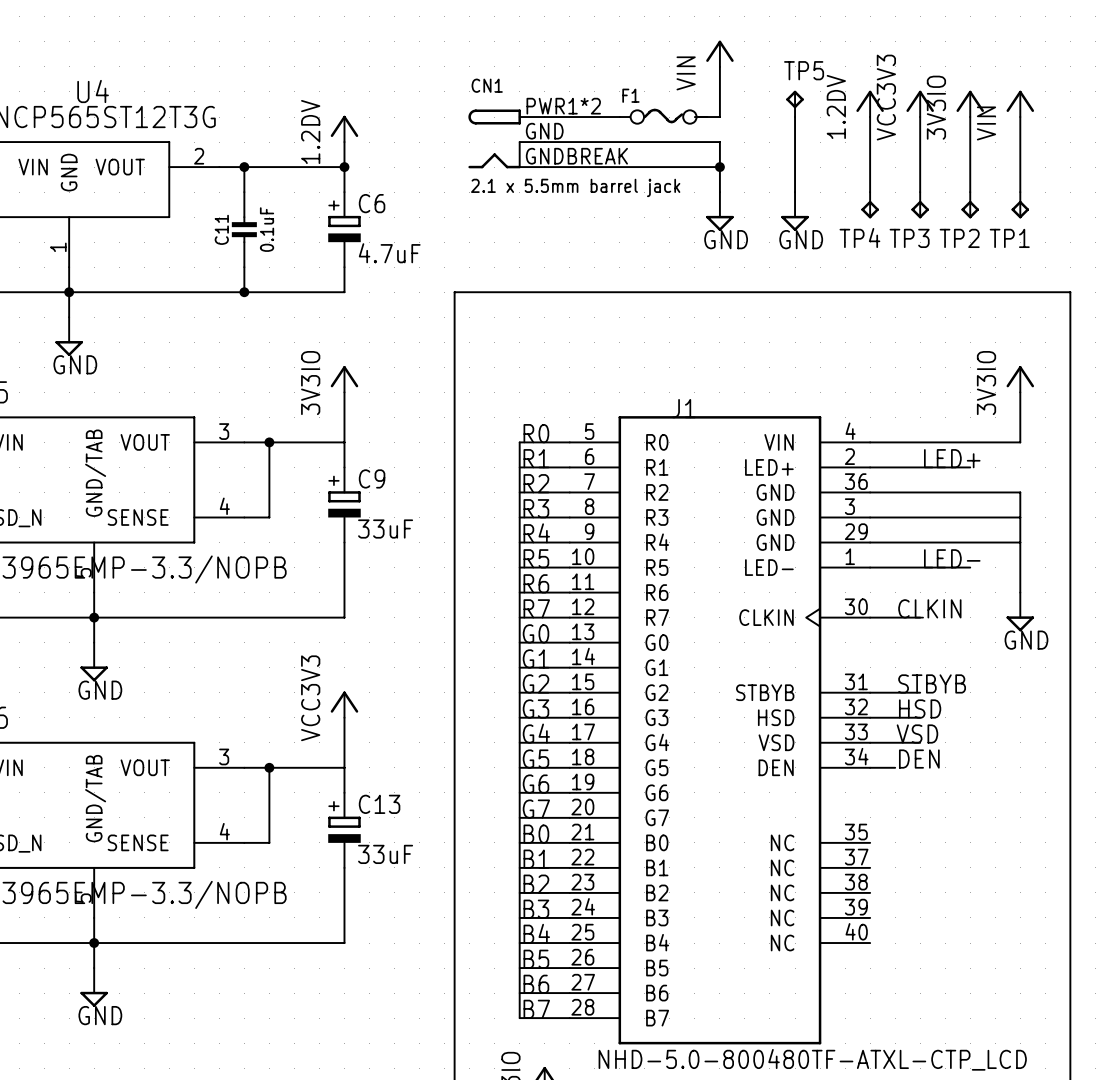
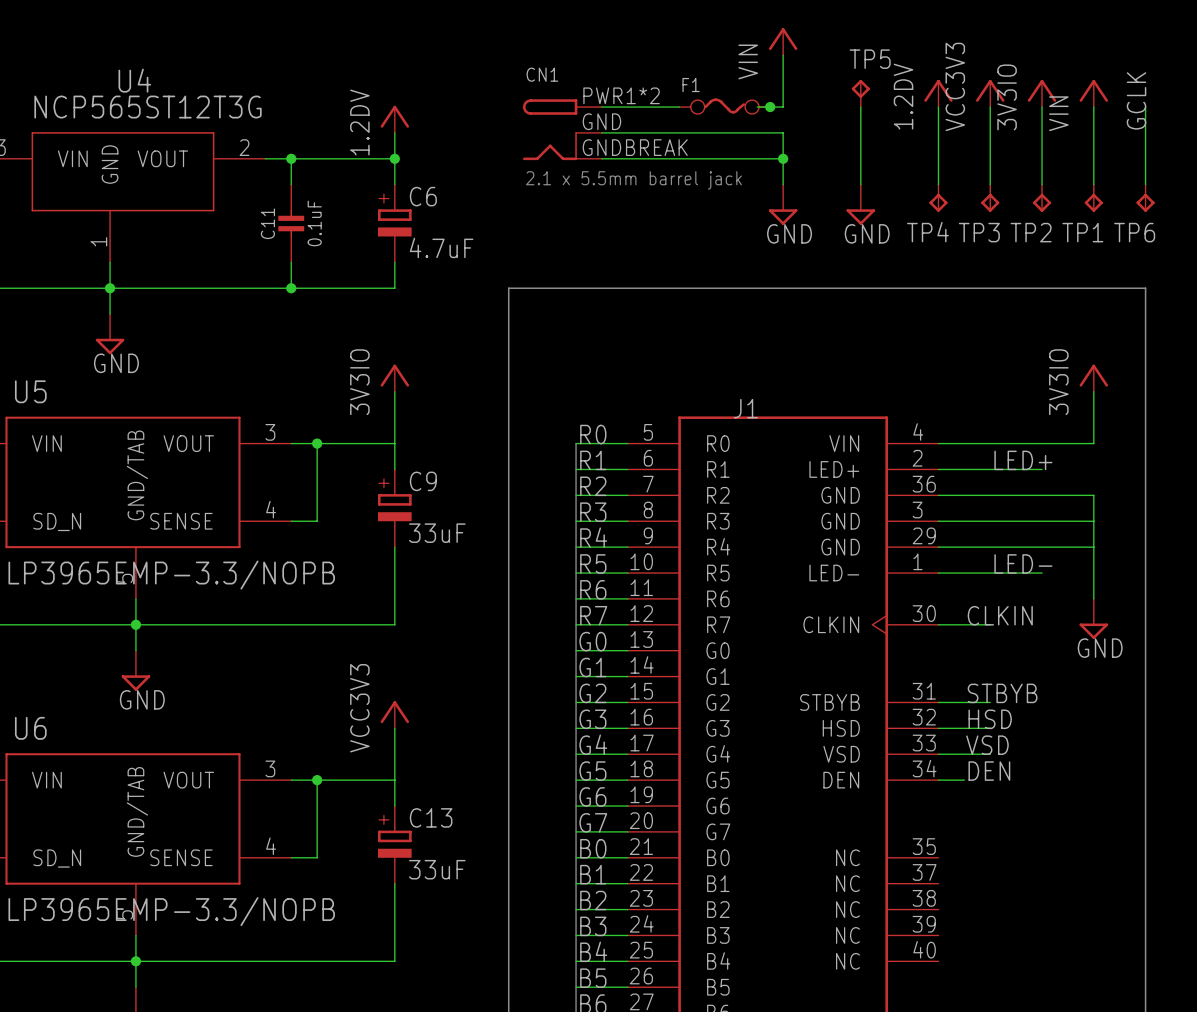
label: none -> GCLK (1136, 100)
junction: none -> (770, 107)
wire: none -> (1145, 107) (1145, 184)
TP6: none -> (1145, 198)

